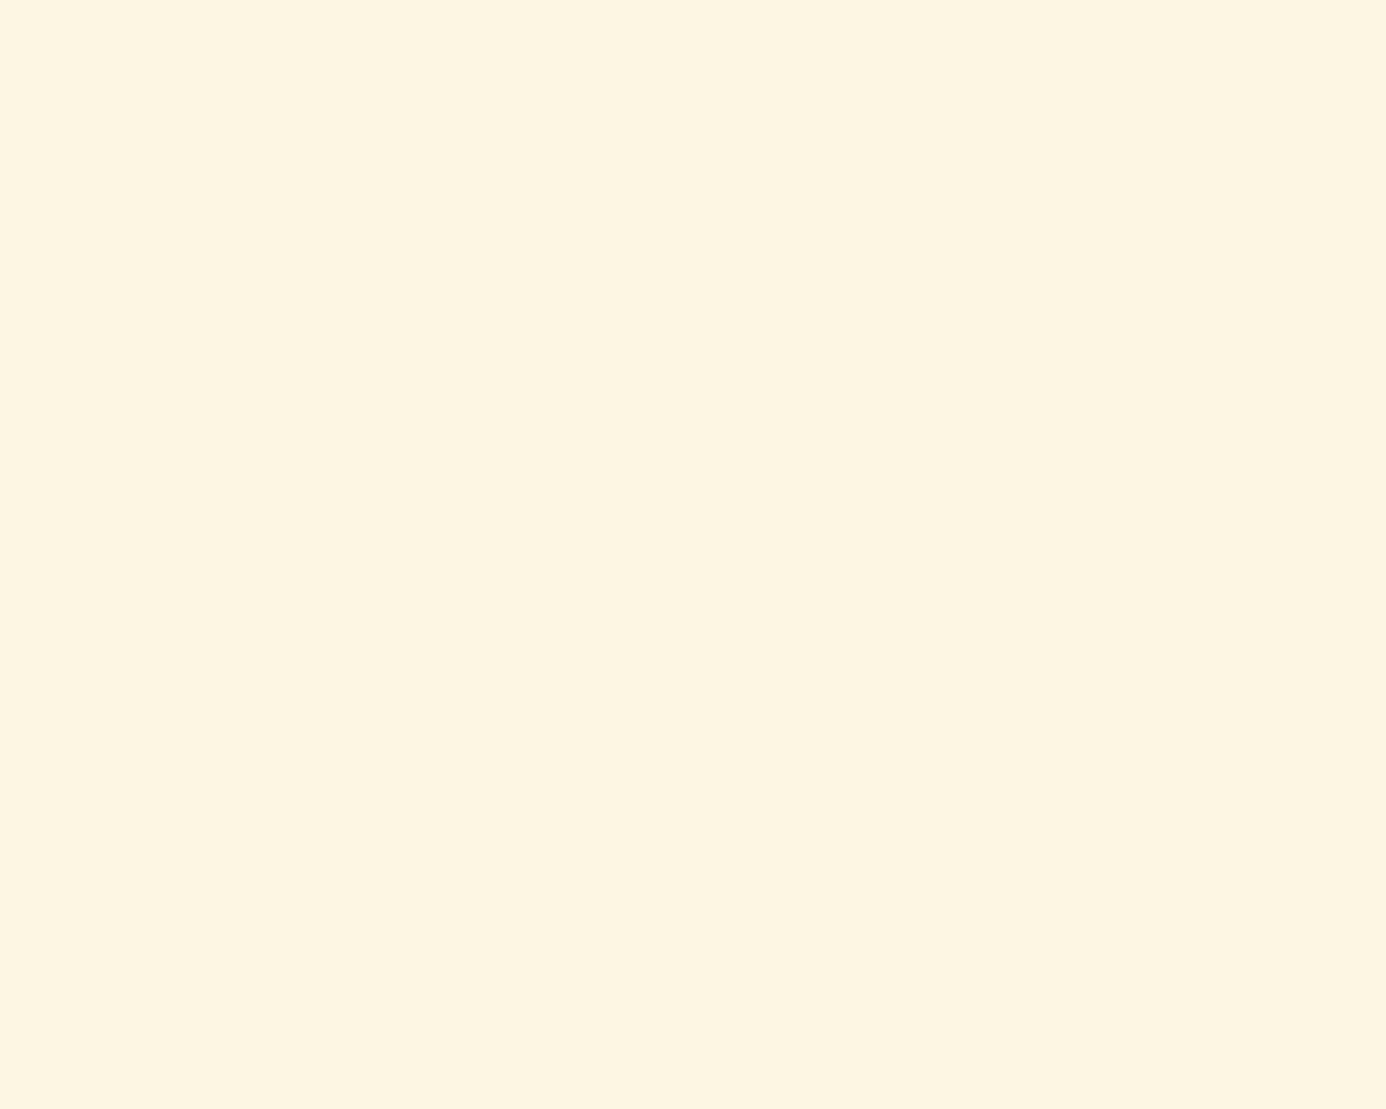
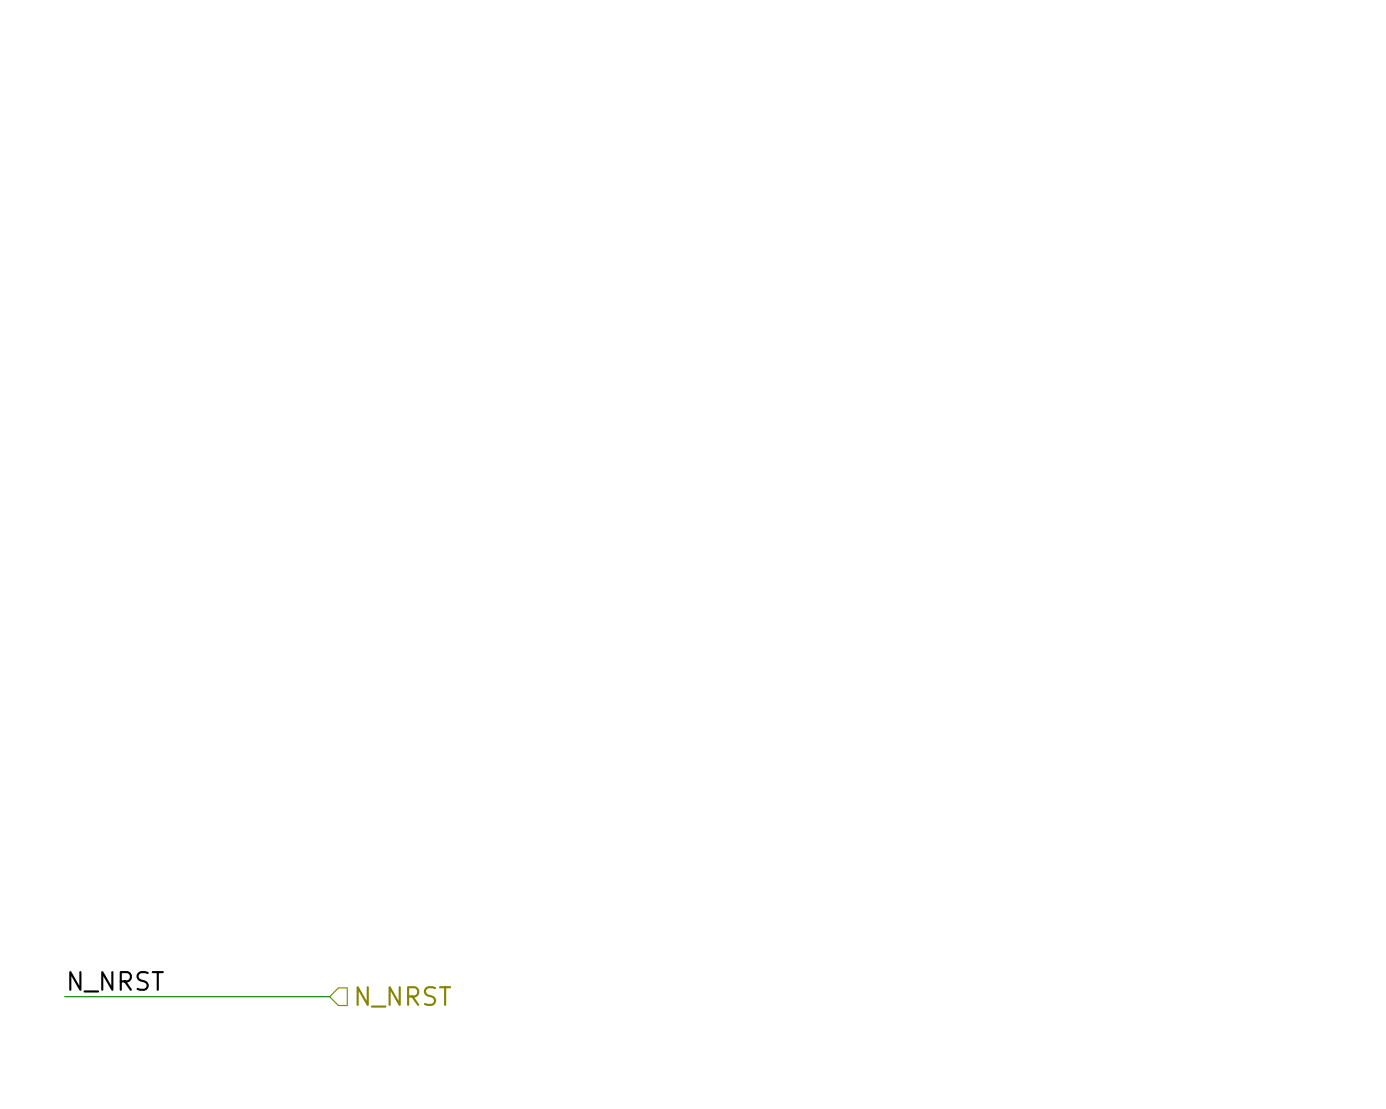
label: none -> N_NRST (116, 981)
wire: none -> (64, 996) (329, 996)
hierarchical label: none -> N_NRST (403, 996)

